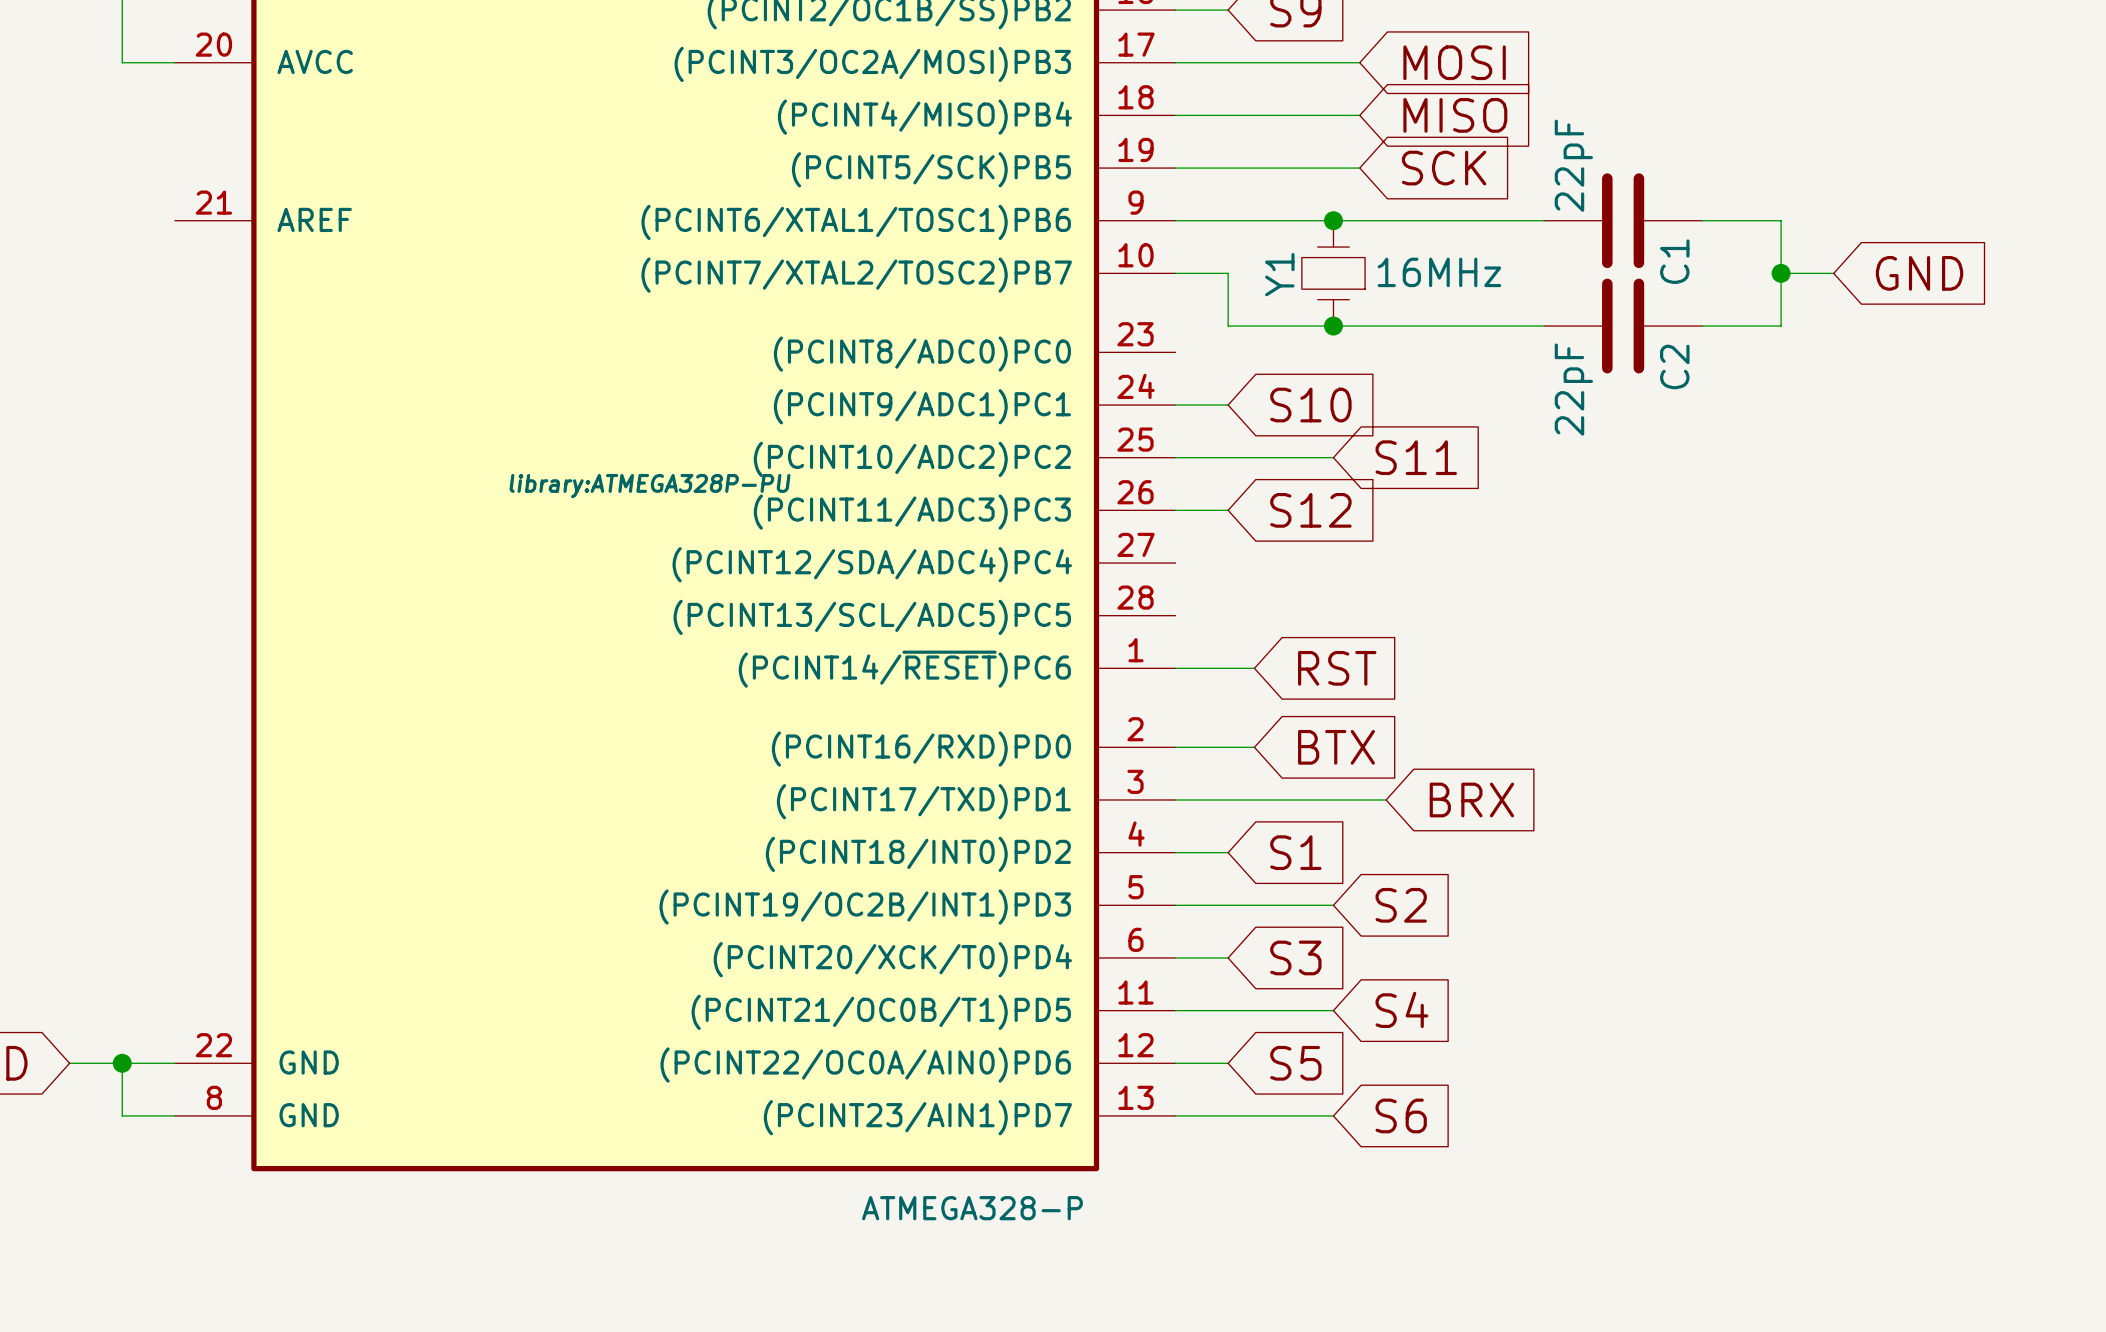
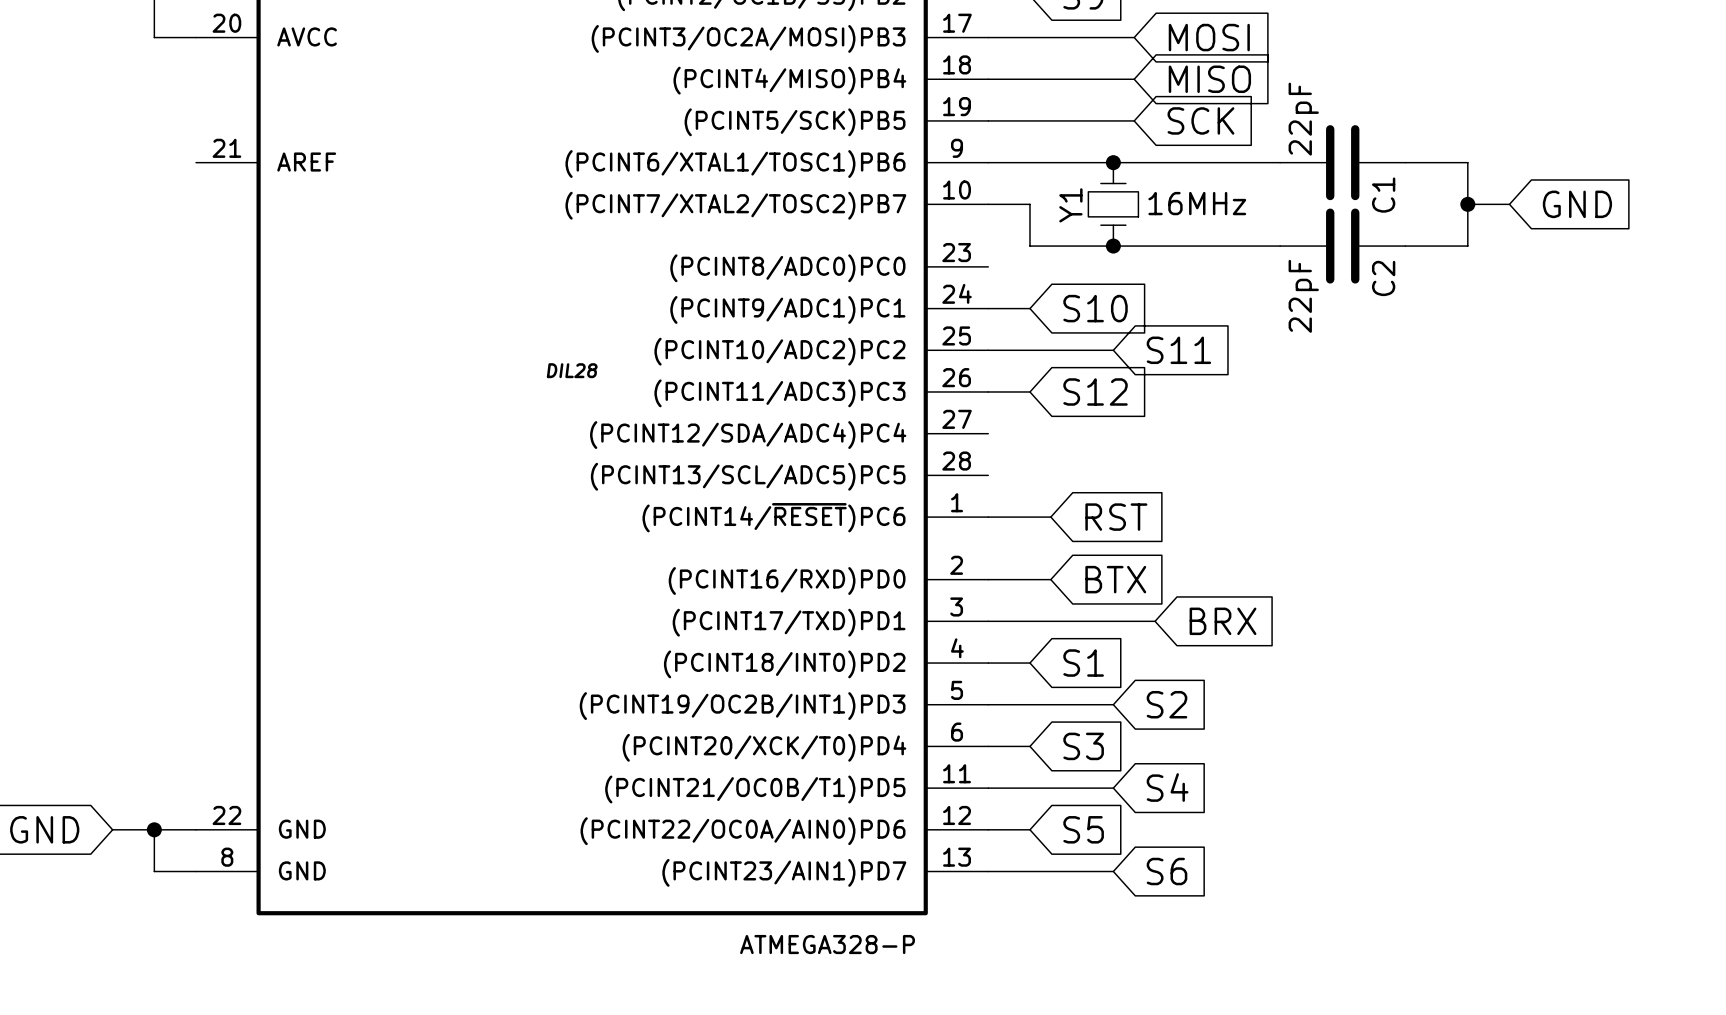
part text: library:ATMEGA328P-PU (650, 486) -> DIL28 (572, 370)

